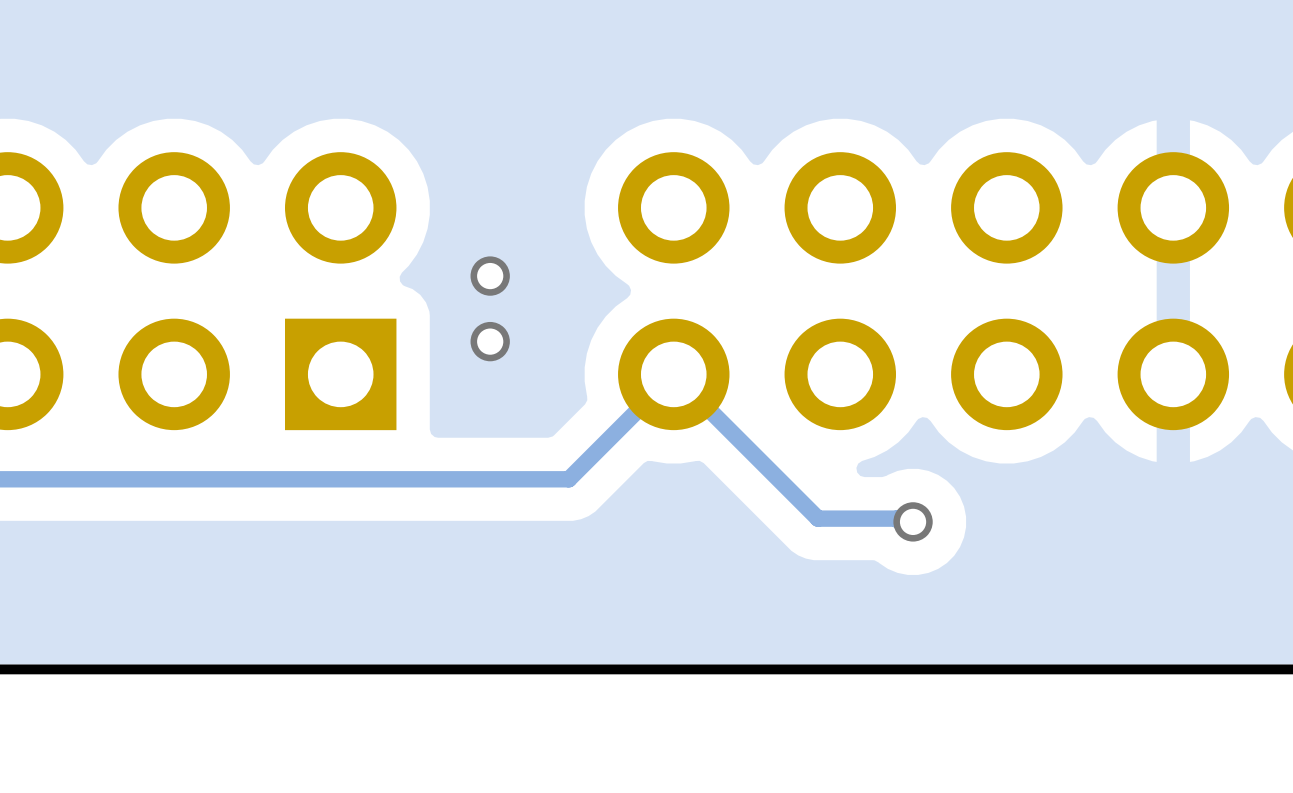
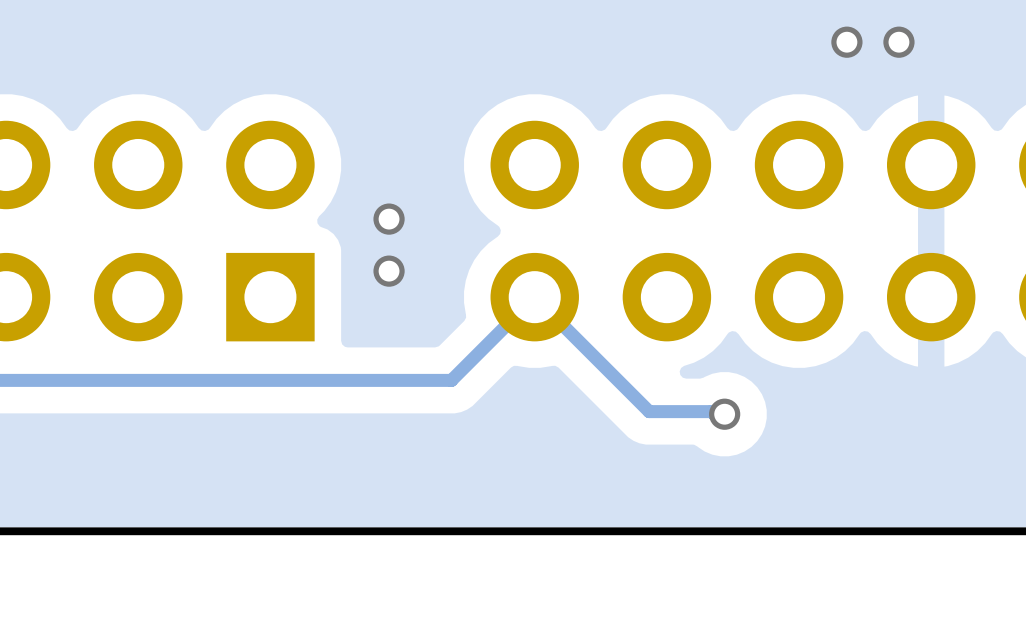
via: none -> (846, 42)
via: none -> (898, 42)

